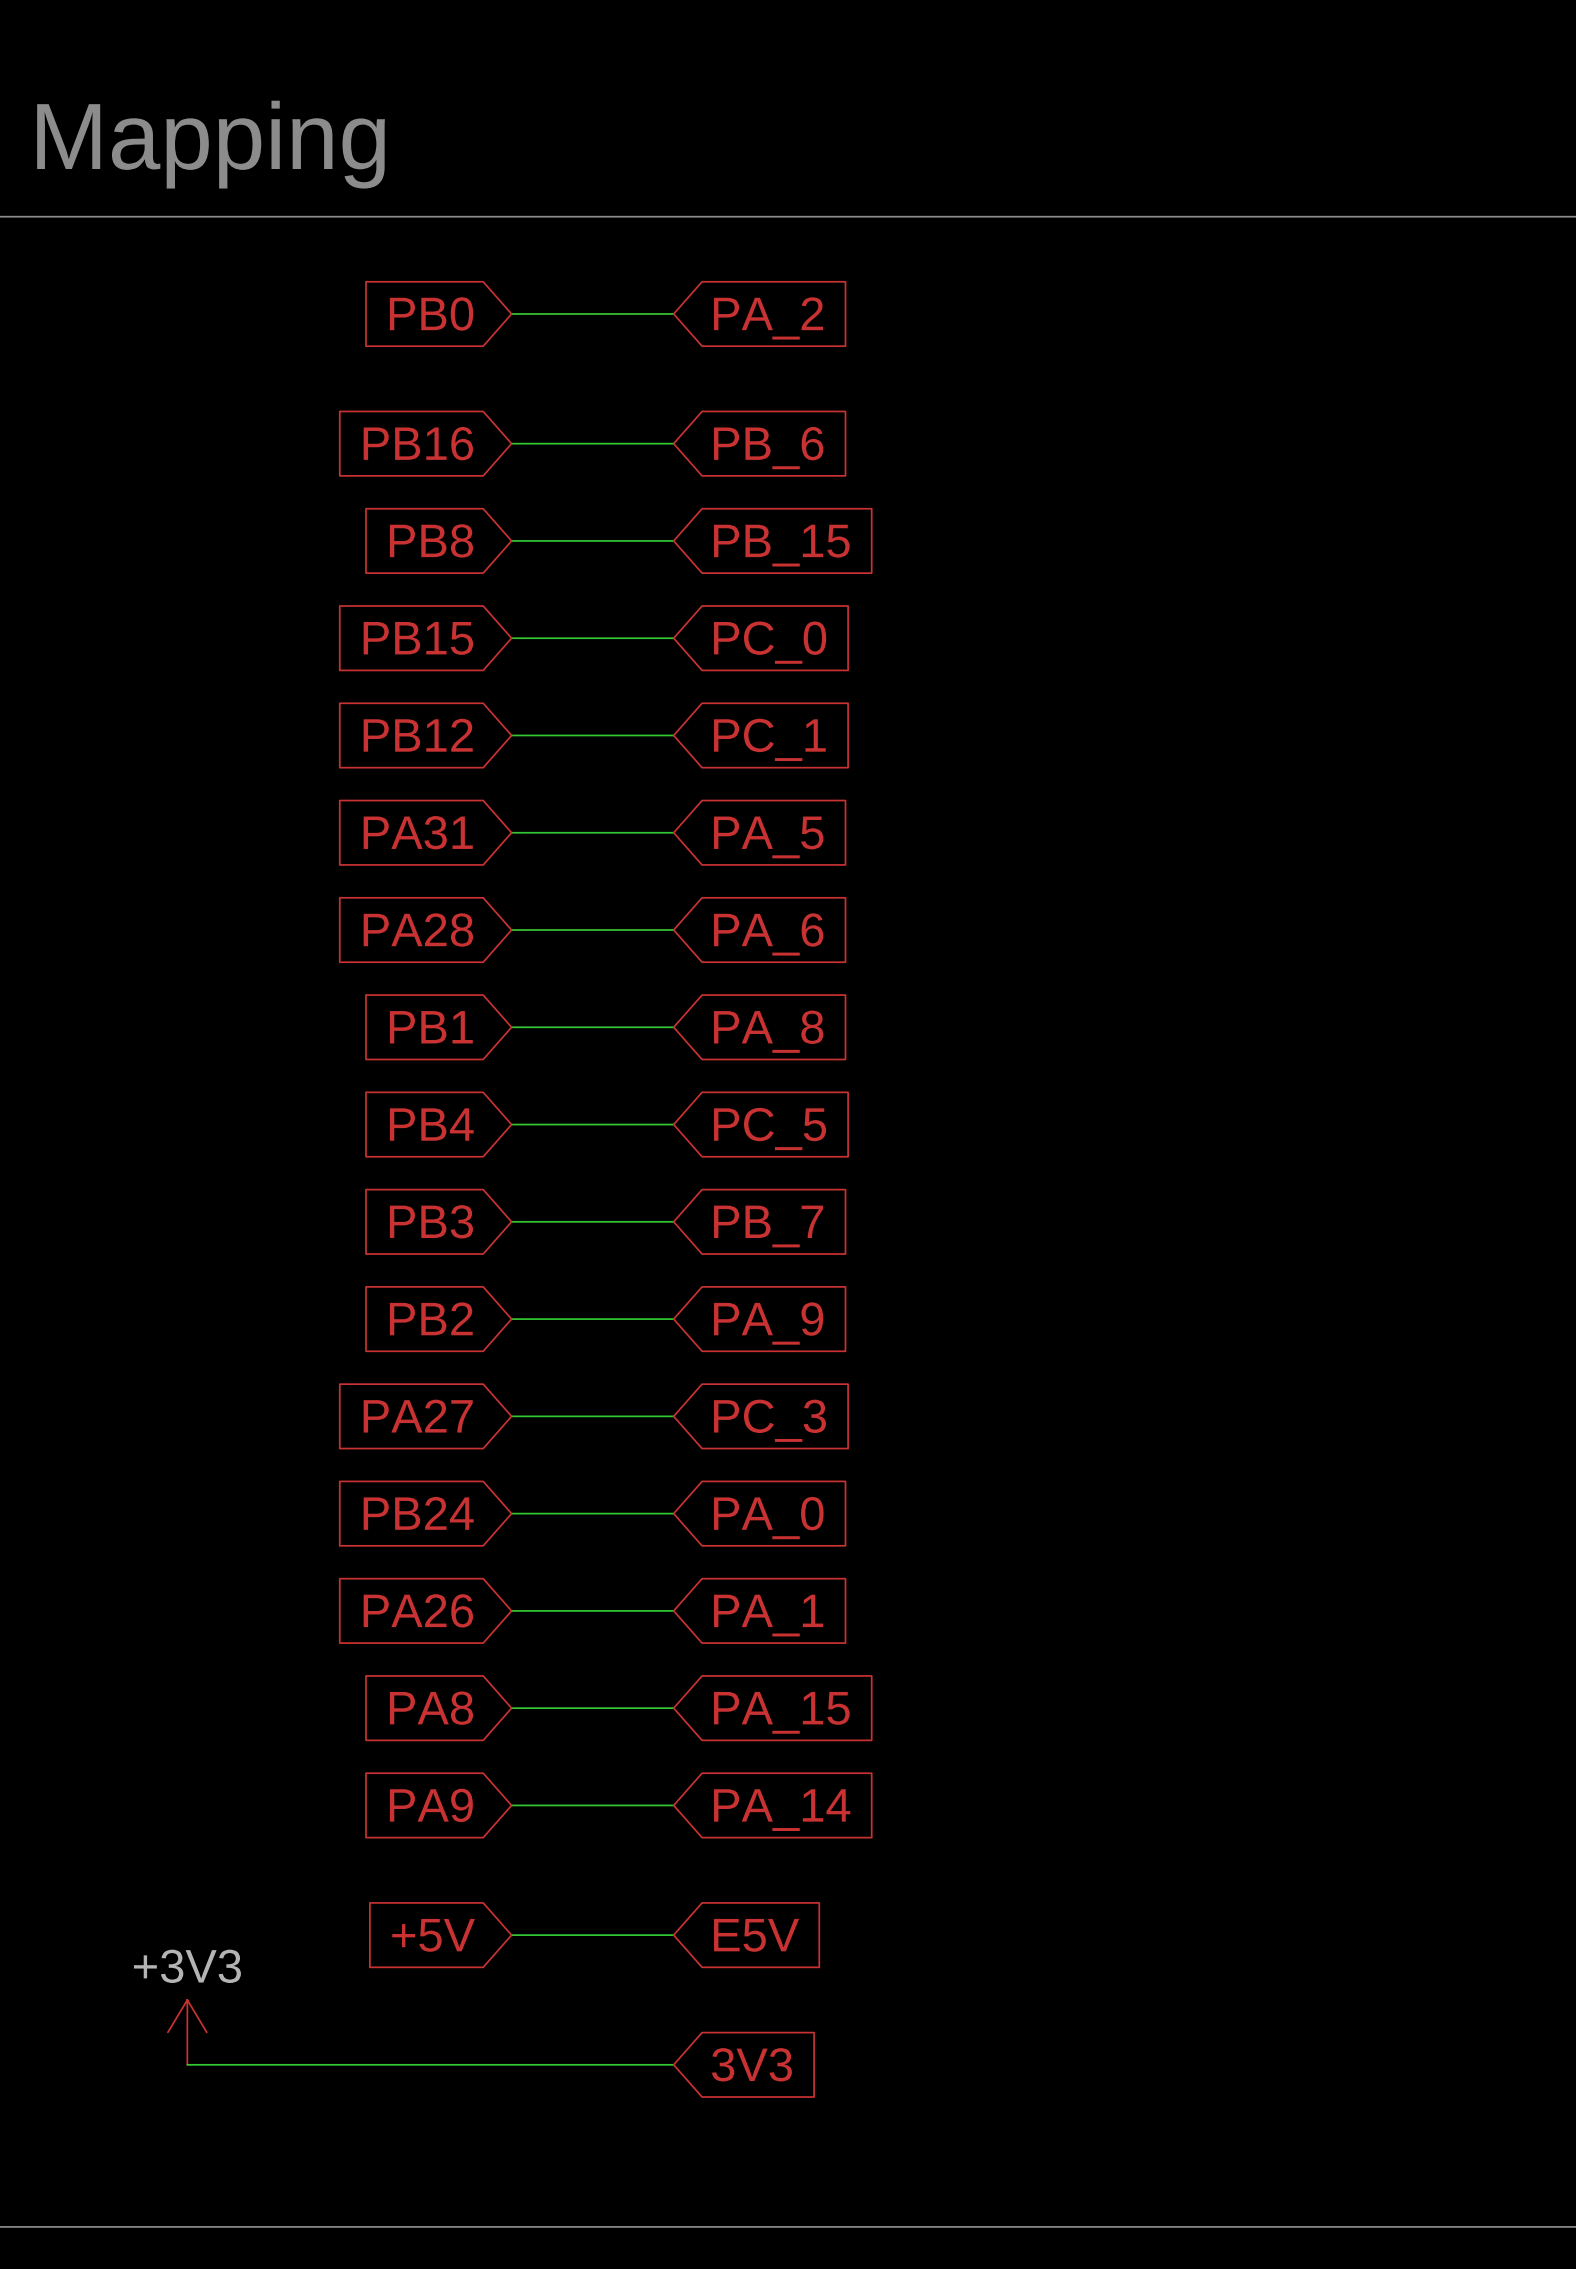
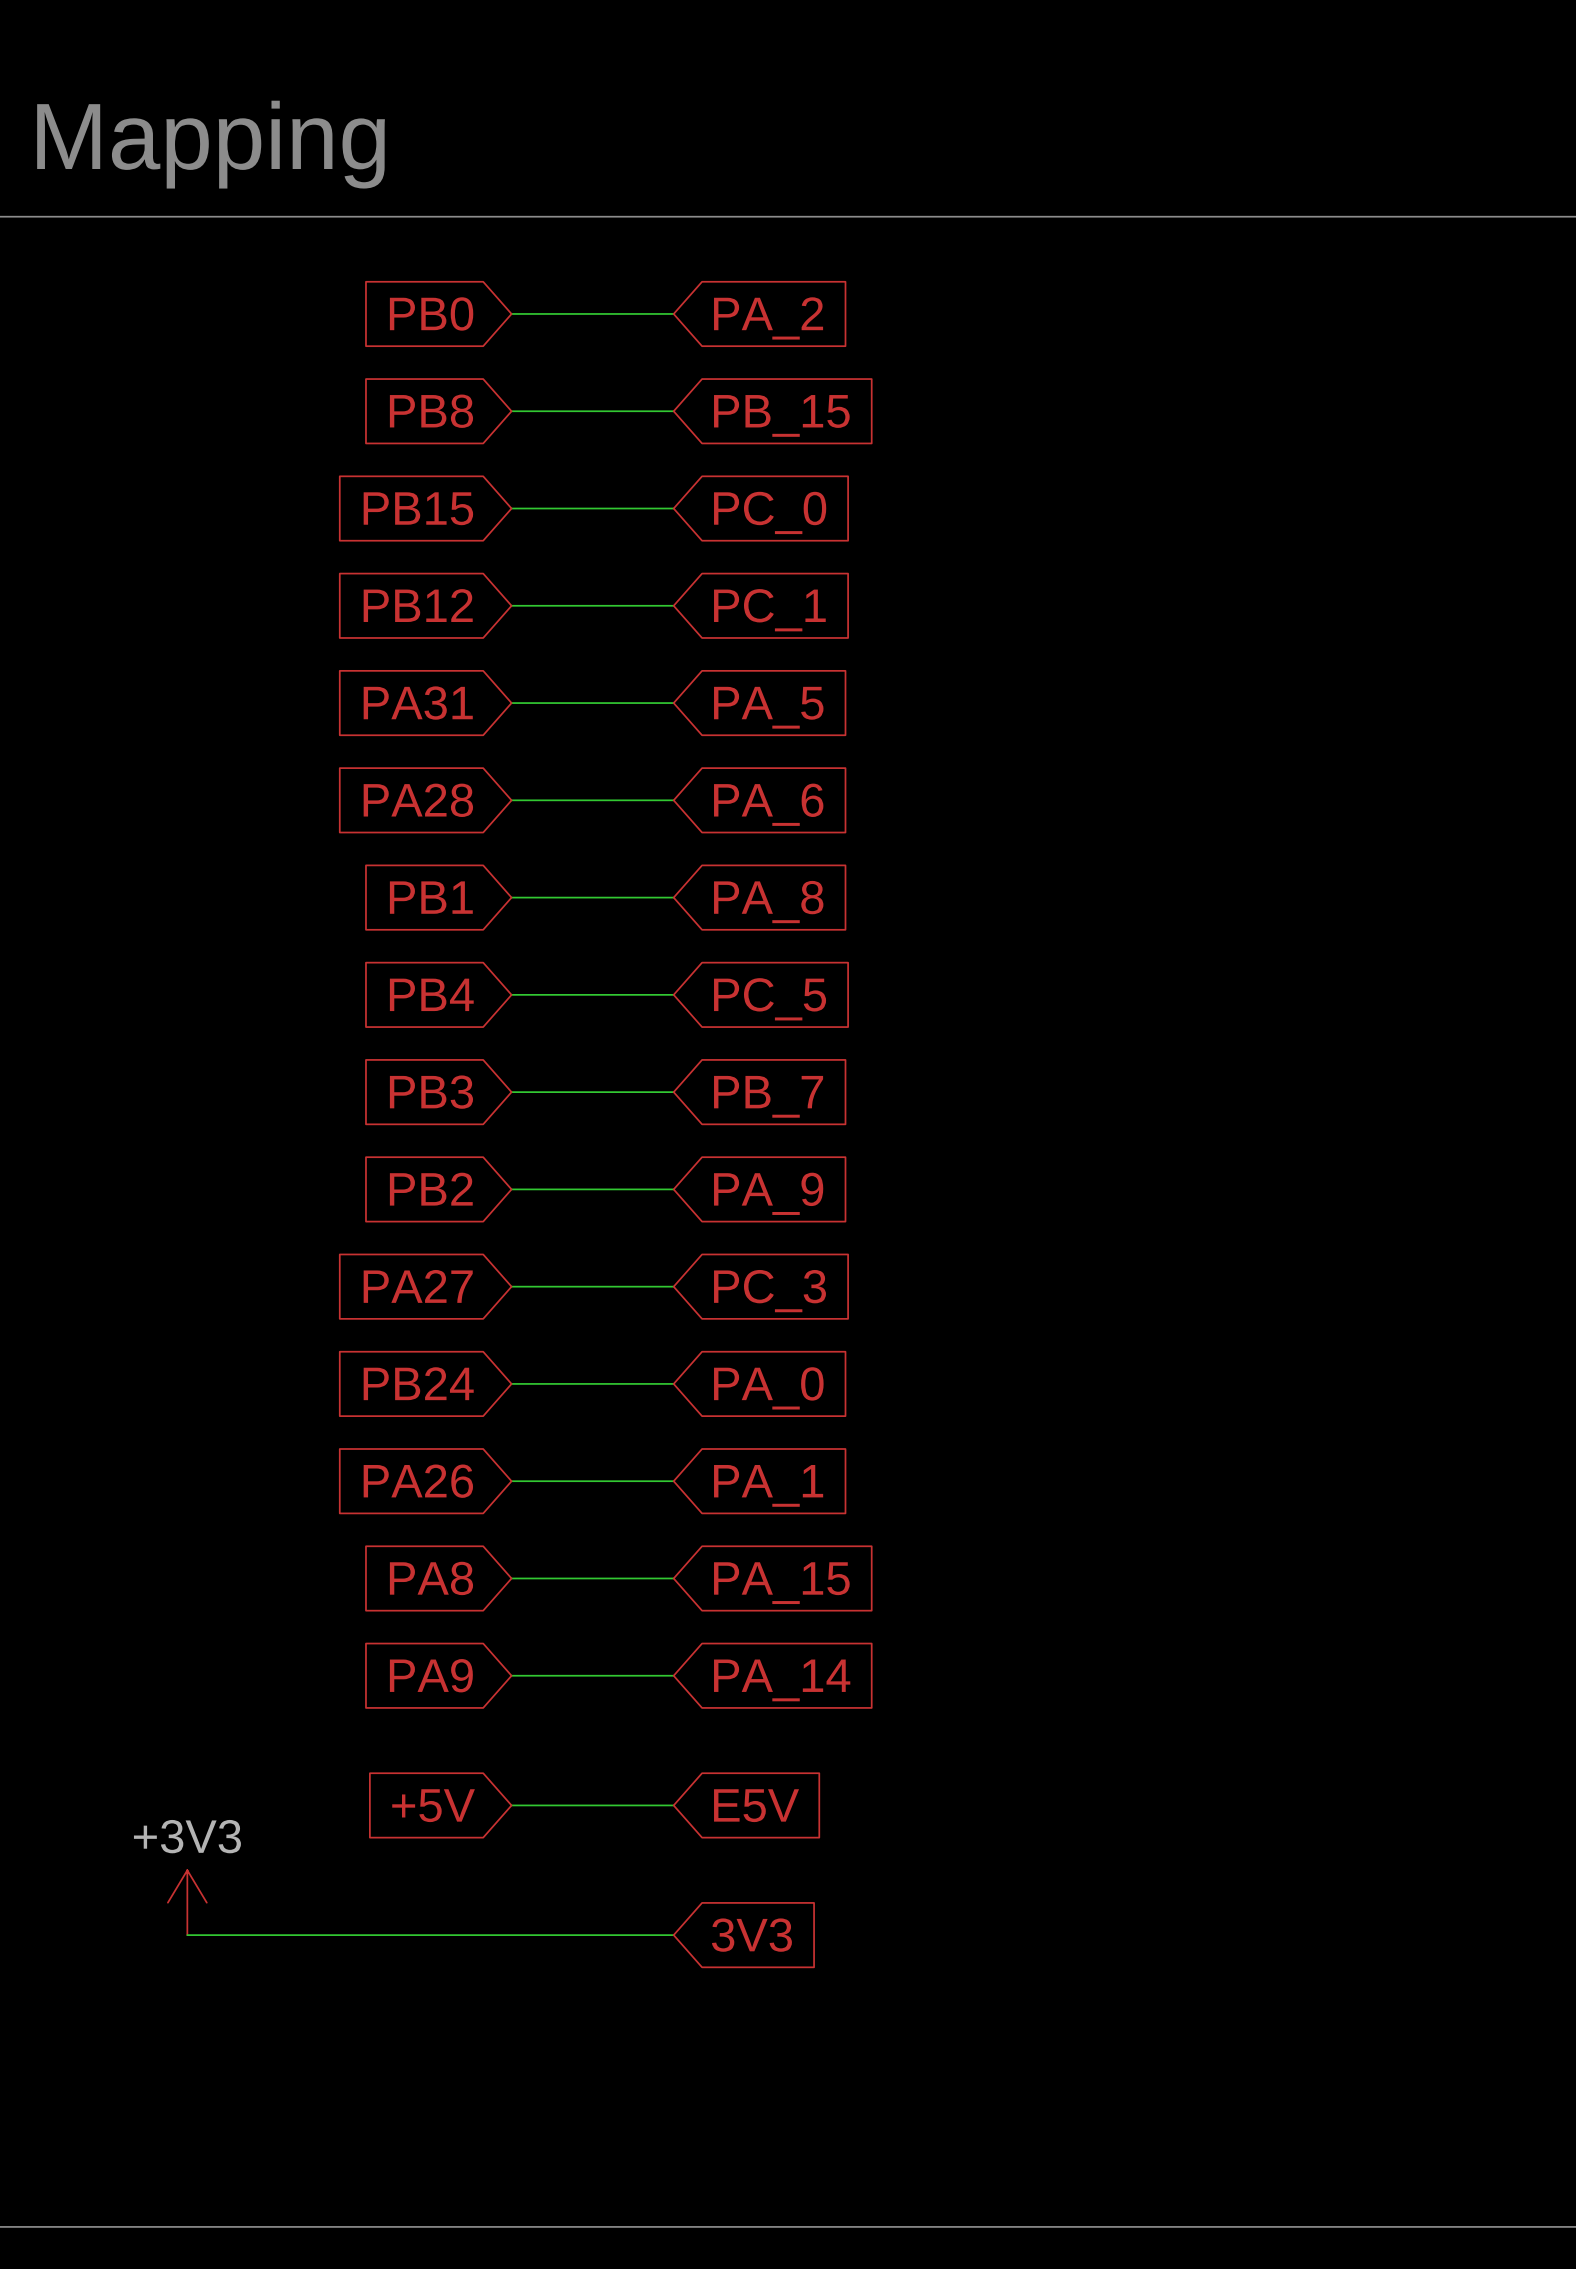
global label: PB16 (418, 443) -> none
wire: (511, 443) (673, 443) -> (511, 411) (673, 411)
global label: PB_6 (768, 448) -> none
global label position: PB8 (431, 540) -> PB8 (431, 411)
wire: (511, 540) (673, 540) -> (511, 508) (673, 508)
global label position: PB_15 (781, 545) -> PB_15 (781, 415)
global label position: PB15 (418, 638) -> PB15 (418, 508)
wire: (511, 638) (673, 638) -> (511, 605) (673, 605)
global label position: PC_0 (770, 642) -> PC_0 (770, 512)
global label position: PB12 (418, 735) -> PB12 (418, 605)
wire: (511, 735) (673, 735) -> (511, 703) (673, 703)
global label position: PC_1 (769, 739) -> PC_1 (769, 610)
global label position: PA31 (418, 832) -> PA31 (418, 703)
wire: (511, 832) (673, 832) -> (511, 800) (673, 800)
global label position: PA_5 (768, 837) -> PA_5 (768, 707)
global label position: PA28 (418, 930) -> PA28 (418, 800)
wire: (511, 930) (673, 930) -> (511, 897) (673, 897)
global label position: PA_6 (768, 934) -> PA_6 (768, 804)
global label position: PB1 (431, 1027) -> PB1 (431, 897)
wire: (511, 1027) (673, 1027) -> (511, 994) (673, 994)
global label position: PA_8 (768, 1031) -> PA_8 (768, 902)
global label position: PB4 (431, 1124) -> PB4 (431, 994)
wire: (511, 1124) (673, 1124) -> (511, 1092) (673, 1092)
global label position: PC_5 (770, 1128) -> PC_5 (770, 999)
global label position: PB3 (431, 1221) -> PB3 (431, 1092)
wire: (511, 1221) (673, 1221) -> (511, 1189) (673, 1189)
global label position: PB_7 (768, 1226) -> PB_7 (768, 1096)
global label position: PB2 (431, 1318) -> PB2 (431, 1189)
wire: (511, 1319) (673, 1319) -> (511, 1286) (673, 1286)
global label position: PA_9 (768, 1323) -> PA_9 (768, 1193)
global label position: PA27 (418, 1416) -> PA27 (418, 1286)
wire: (511, 1416) (673, 1416) -> (511, 1383) (673, 1383)
global label position: PC_3 (770, 1420) -> PC_3 (770, 1291)
global label position: PB24 (418, 1513) -> PB24 (418, 1383)
wire: (511, 1513) (673, 1513) -> (511, 1481) (673, 1481)
global label position: PA_0 (768, 1518) -> PA_0 (768, 1388)
global label position: PA26 (418, 1610) -> PA26 (418, 1481)
wire: (511, 1610) (673, 1610) -> (511, 1578) (673, 1578)
global label position: PA_1 (768, 1615) -> PA_1 (768, 1485)
global label: none -> PA9 (431, 1675)
global label: none -> PA_14 (782, 1680)
global label position: PA8 (431, 1708) -> PA8 (431, 1578)
wire: (511, 1708) (673, 1708) -> (511, 1675) (673, 1675)
global label position: PA_15 (781, 1712) -> PA_15 (781, 1583)
global label: PA9 (431, 1805) -> +5V (433, 1805)
global label: PA_14 (782, 1810) -> E5V (756, 1805)
wire: none -> (187, 1935) (511, 1935)
global label: +5V (433, 1935) -> none
global label: E5V (756, 1935) -> 3V3 (751, 1935)
power symbol position: +3V3 (187, 2032) -> +3V3 (187, 1902)
wire: (187, 2064) (673, 2064) -> none
global label: 3V3 (751, 2064) -> none

